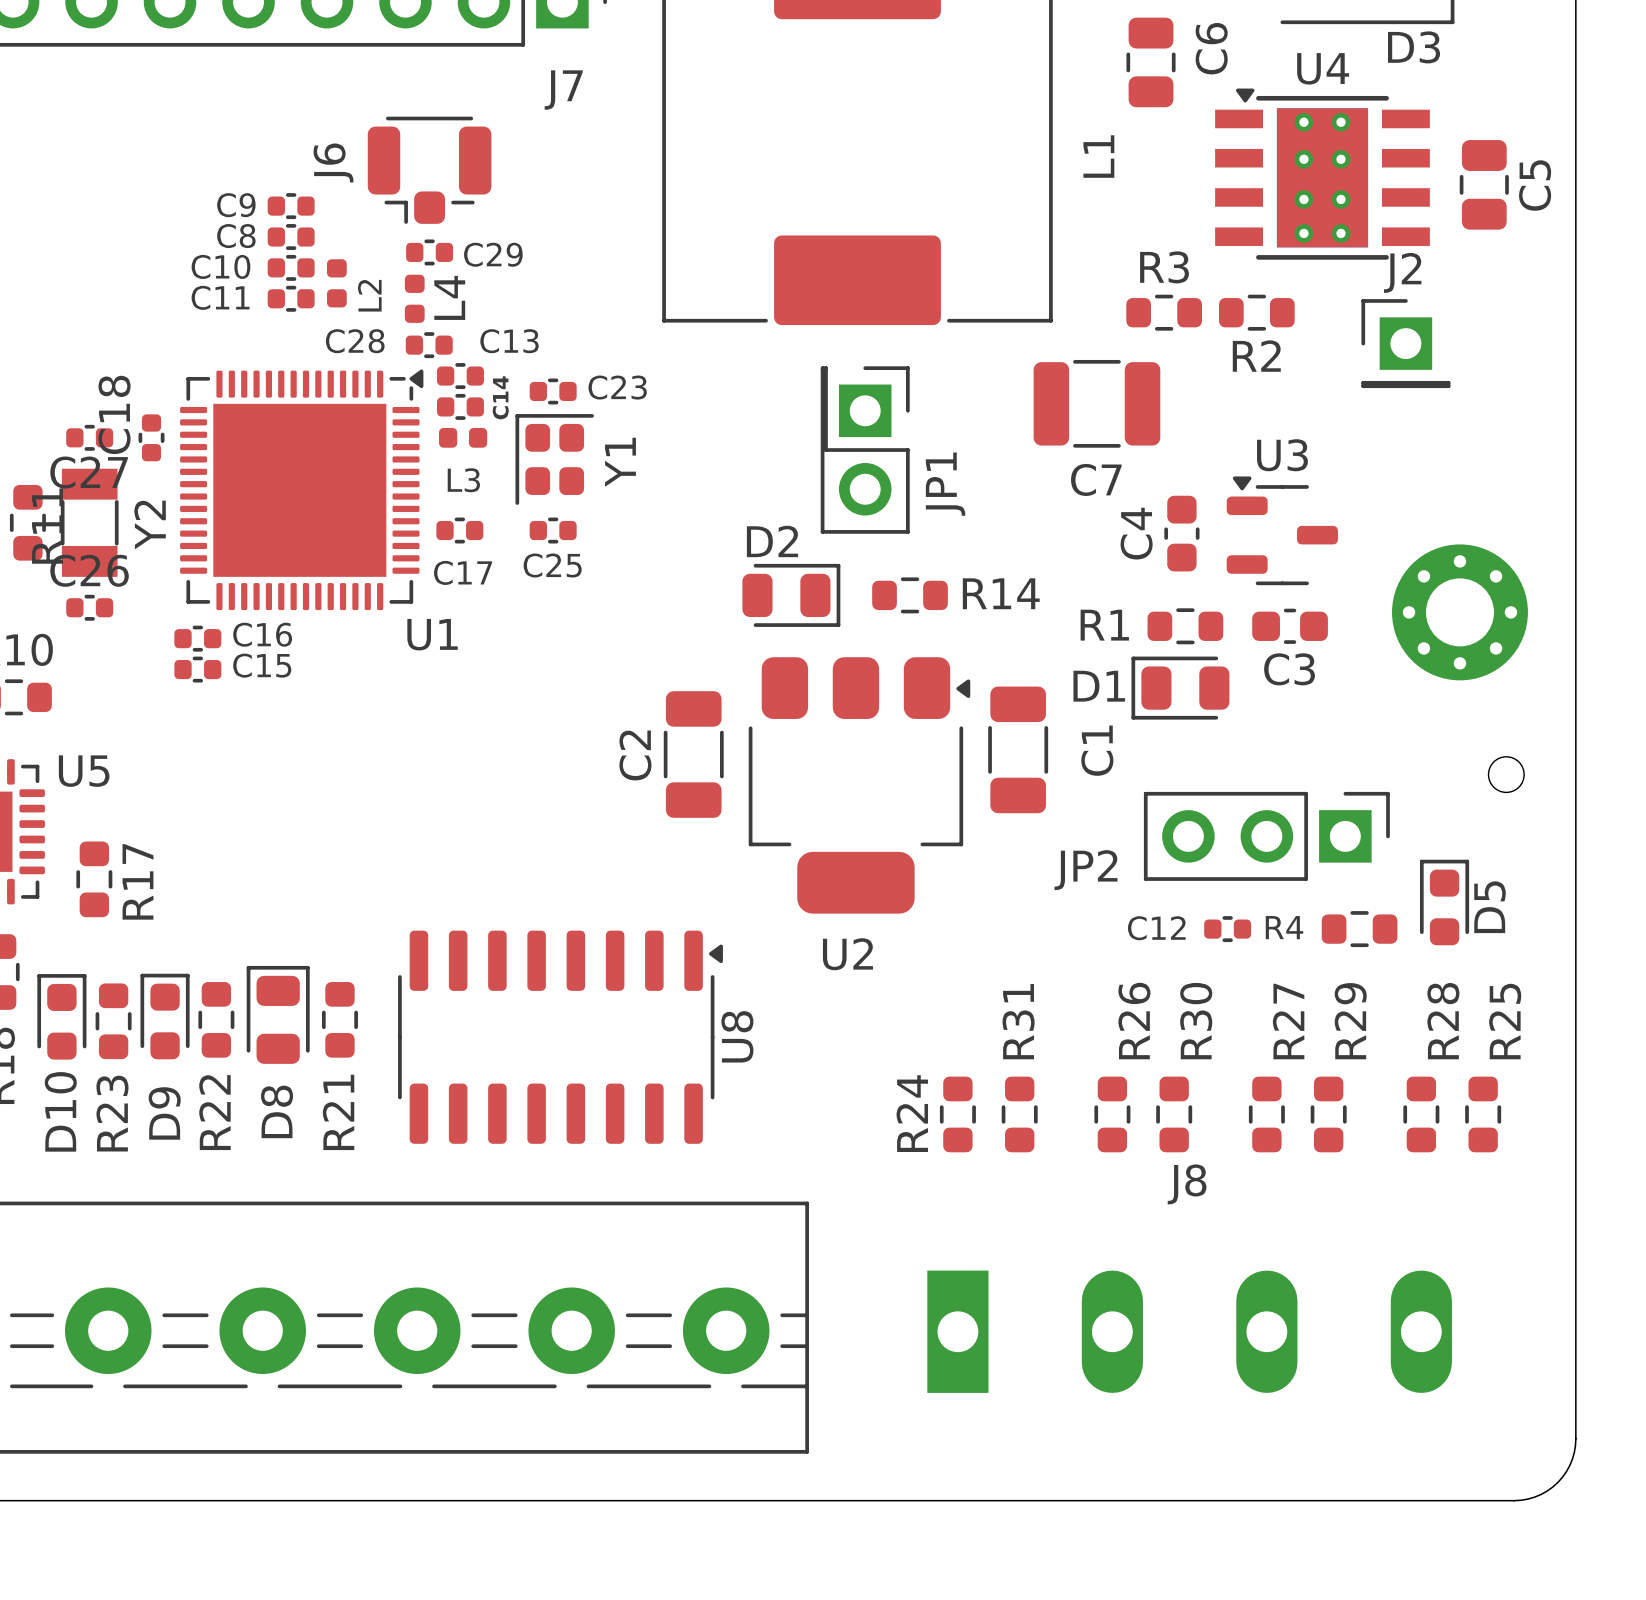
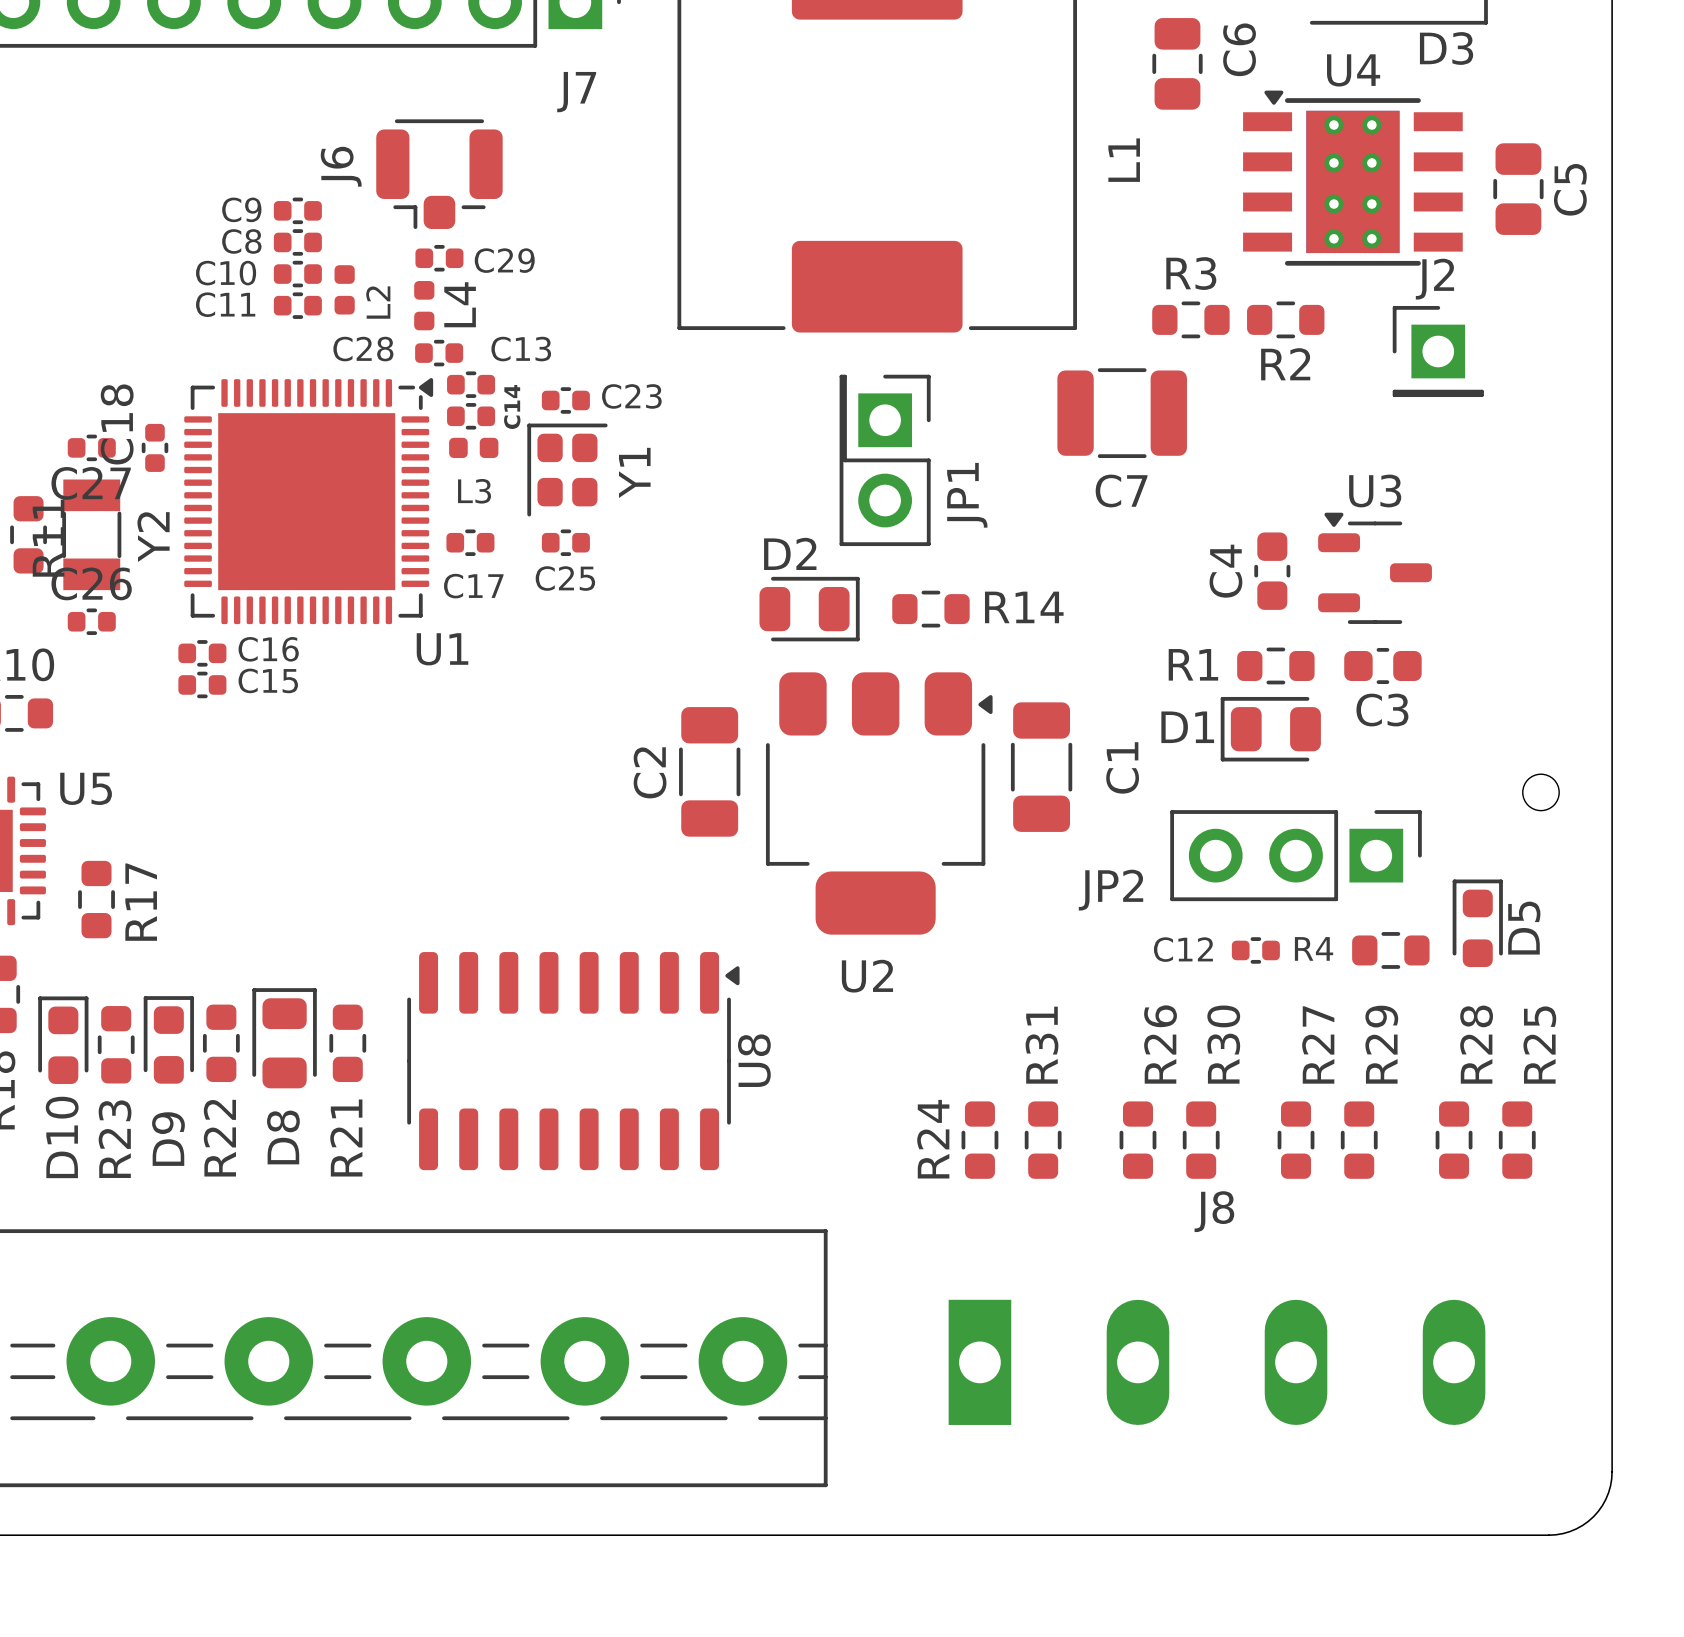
U3 position: (1282, 530) -> (1375, 568)
C4 position: (1181, 533) -> (1272, 571)
part: (1459, 612) -> none
R1 position: (1185, 626) -> (1275, 665)
C3 position: (1290, 626) -> (1382, 665)
D1 position: (1180, 688) -> (1270, 729)

